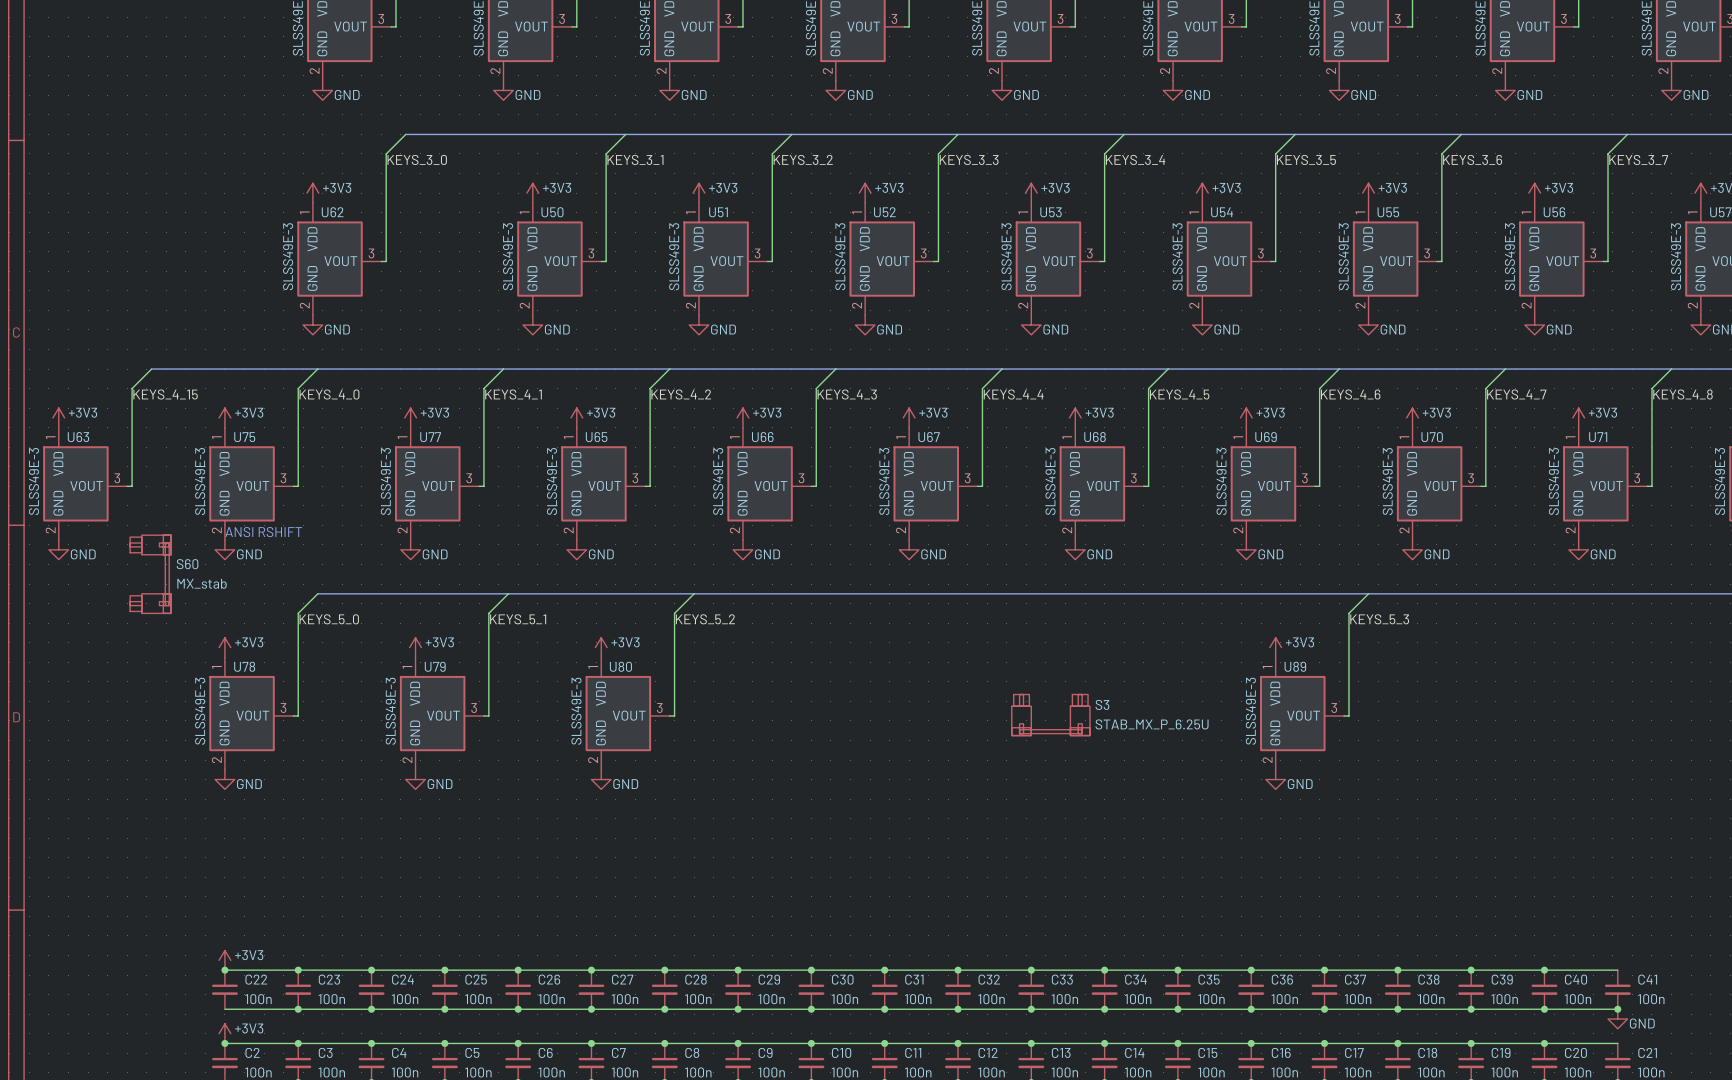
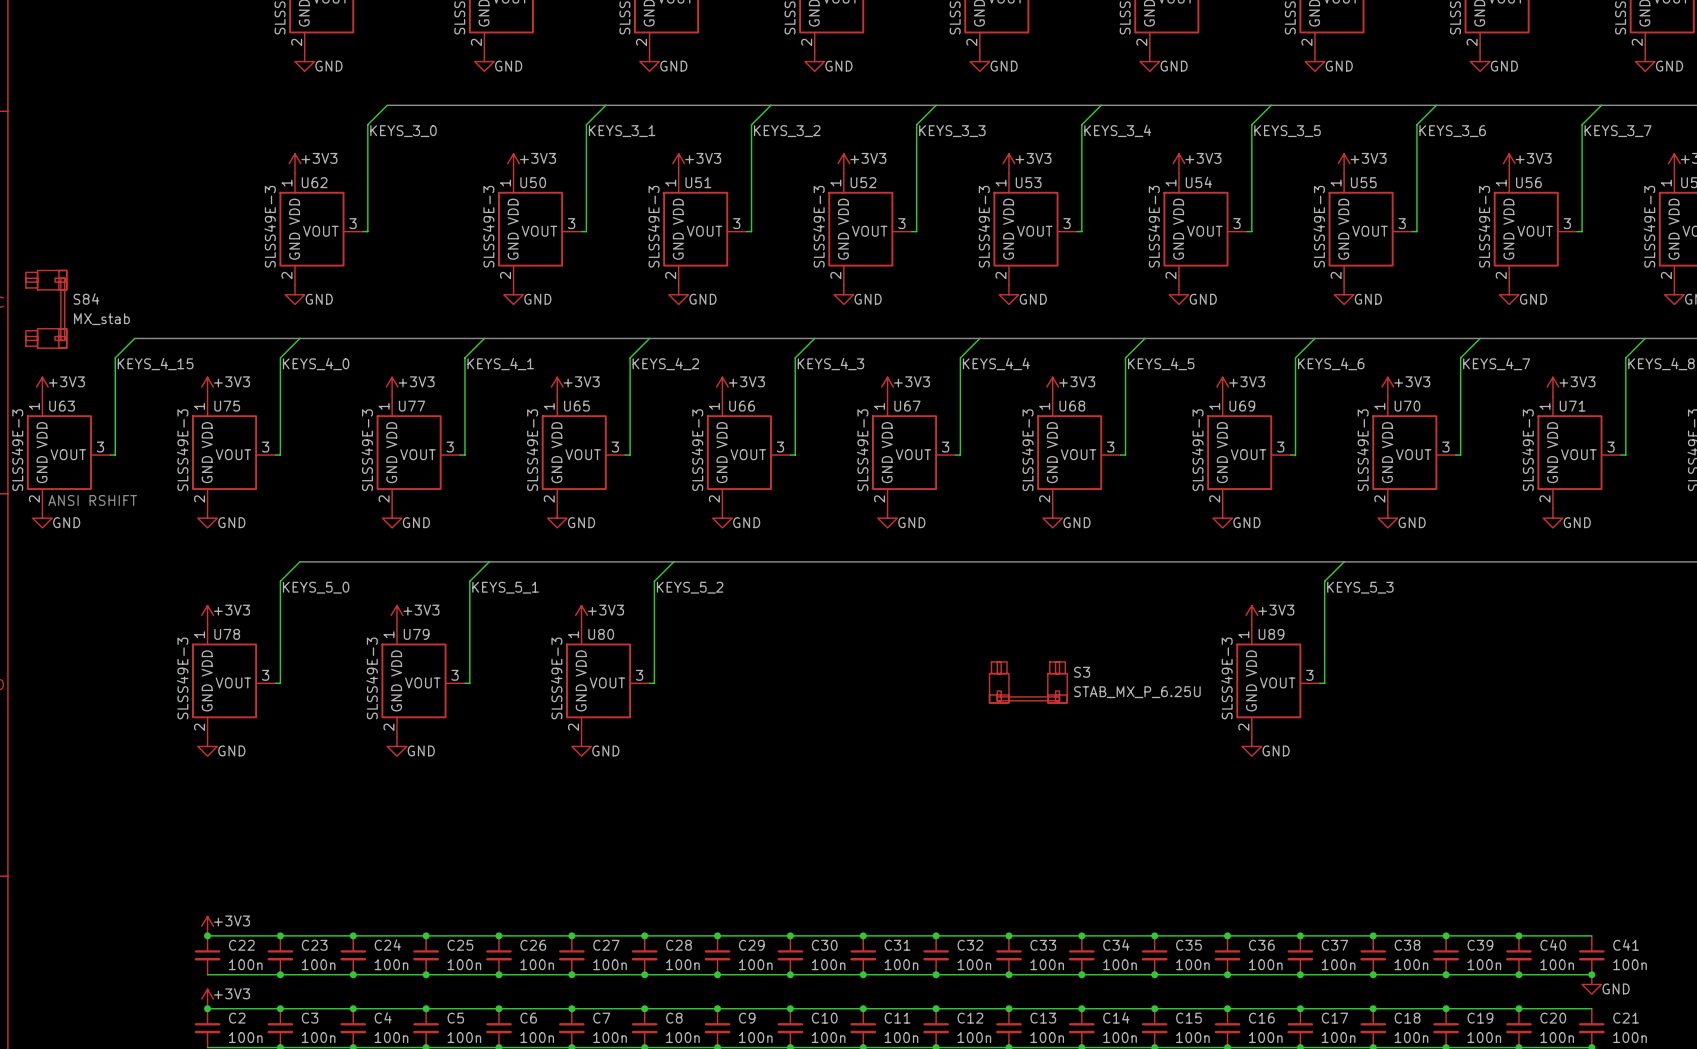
S84: none -> MX_stab (46, 309)
text position: ANSI RSHIFT (263, 532) -> ANSI RSHIFT (92, 500)
S60: MX_stab (150, 574) -> none

